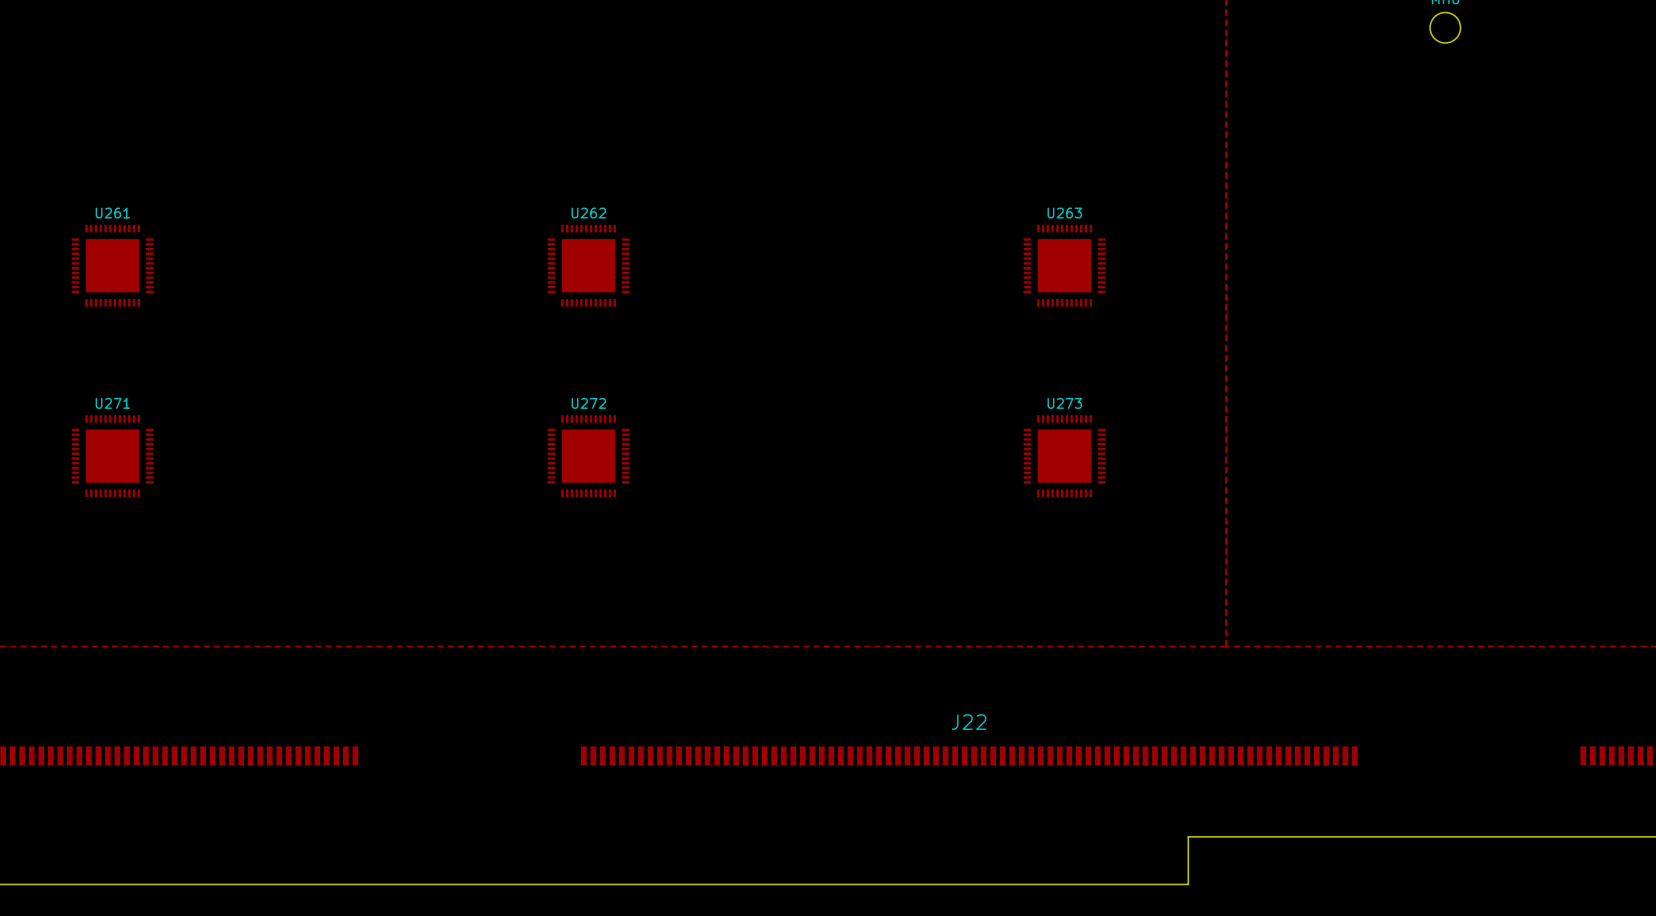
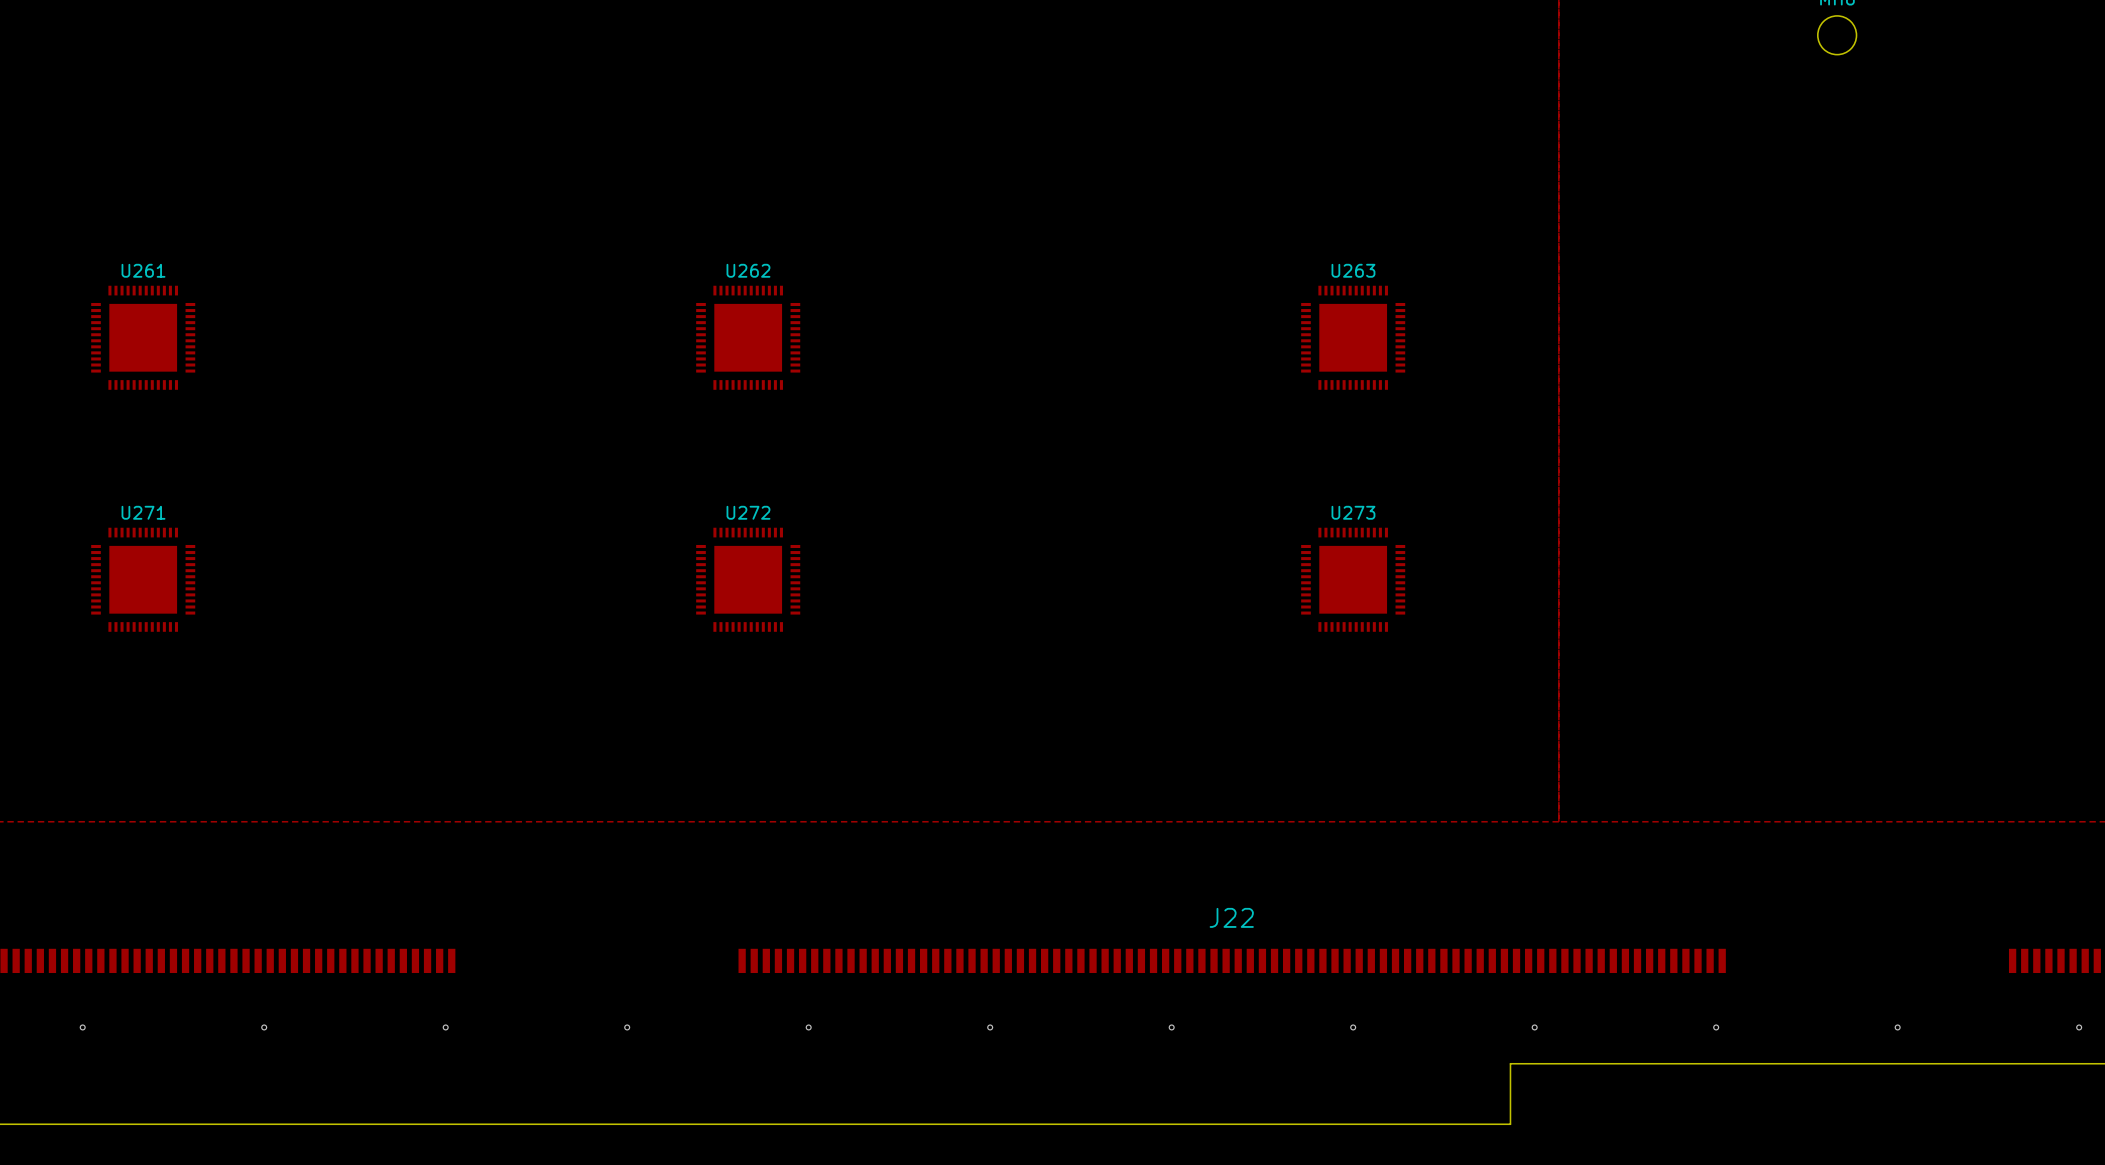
via: none -> (82, 1027)
via: none -> (264, 1027)
via: none -> (445, 1027)
via: none -> (627, 1027)
via: none -> (808, 1027)
via: none -> (990, 1027)
via: none -> (1171, 1027)
via: none -> (1353, 1027)
via: none -> (1534, 1027)
via: none -> (1716, 1027)
via: none -> (1897, 1027)
via: none -> (2079, 1027)

